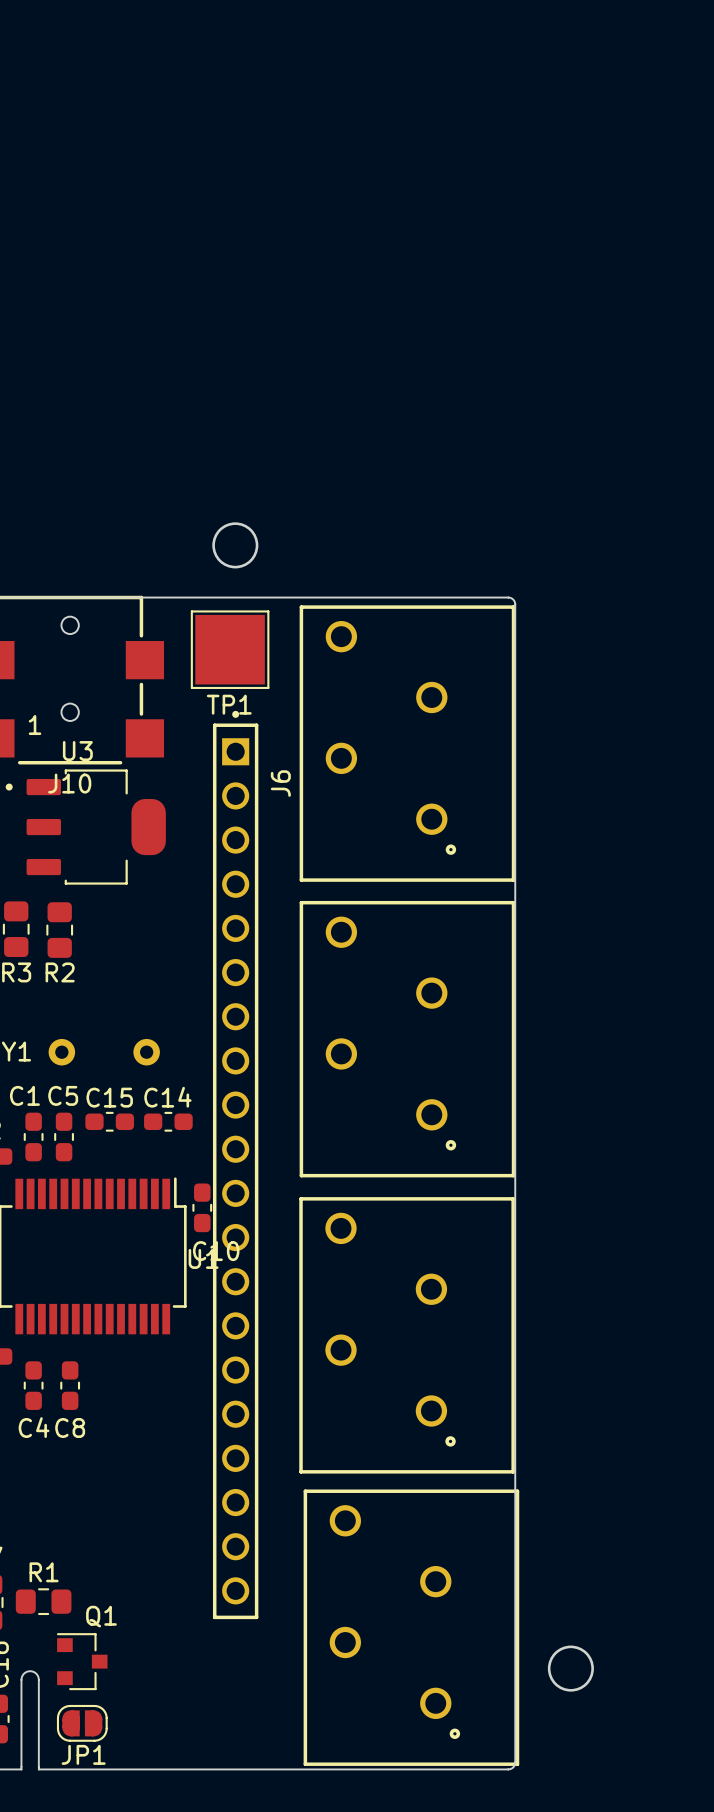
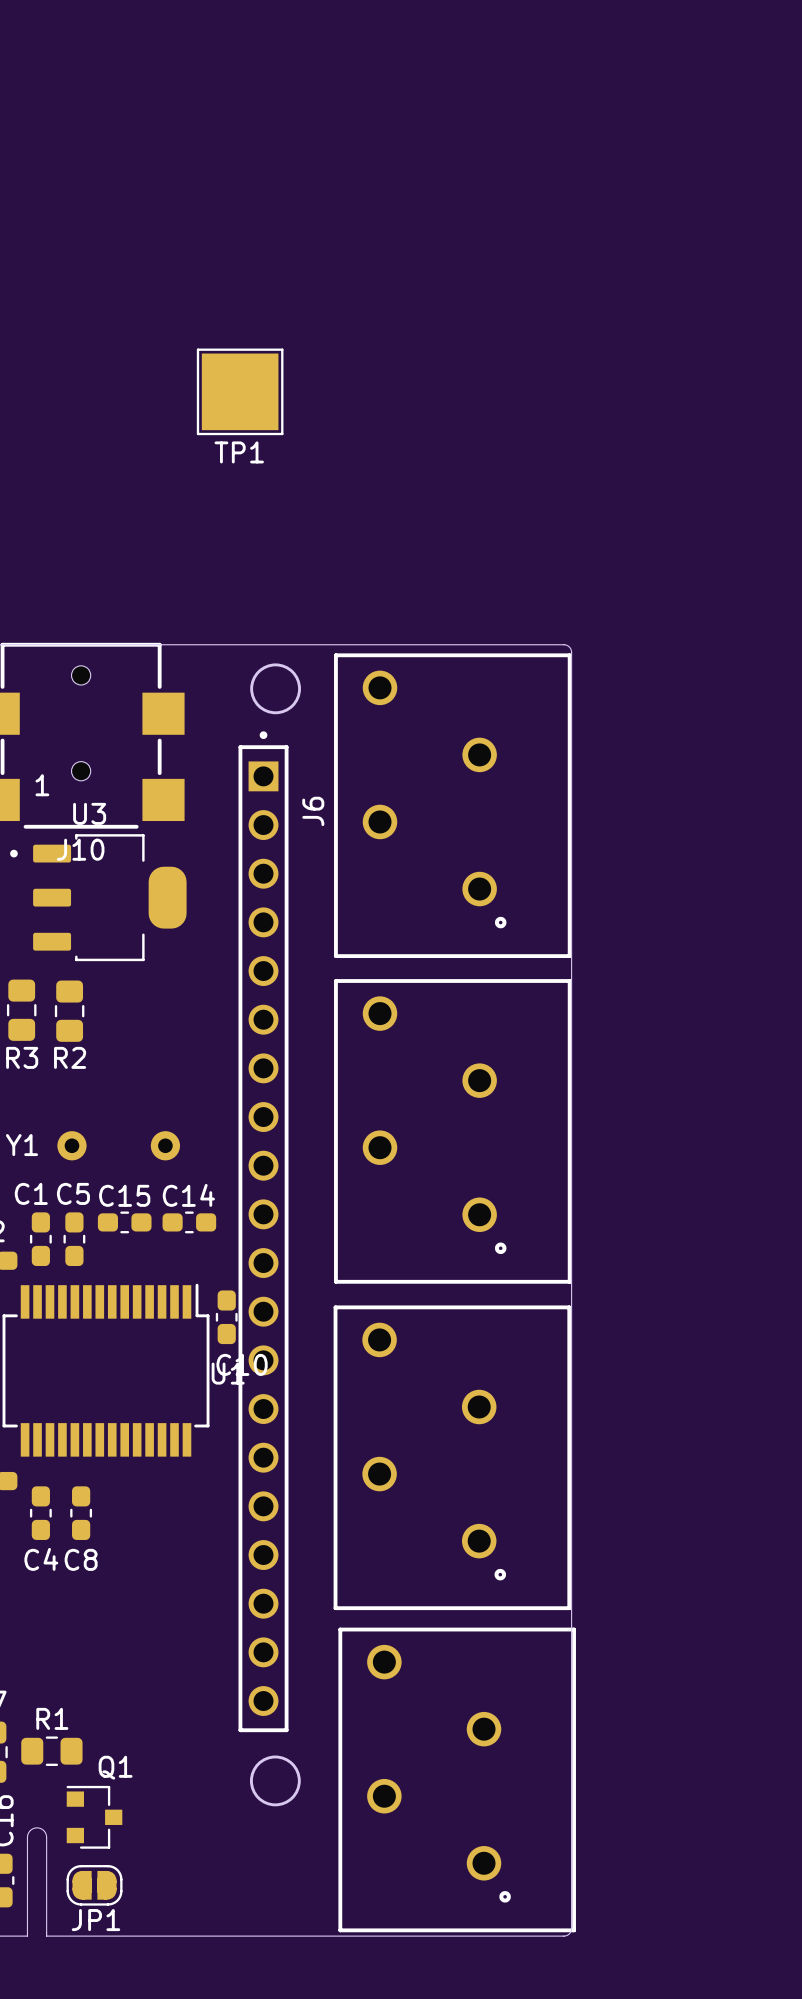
round board edge position: (235, 545) -> (275, 688)
TP1 position: (230, 649) -> (240, 391)
J6 position: (235, 1165) -> (263, 1231)
round board edge position: (570, 1668) -> (275, 1780)

